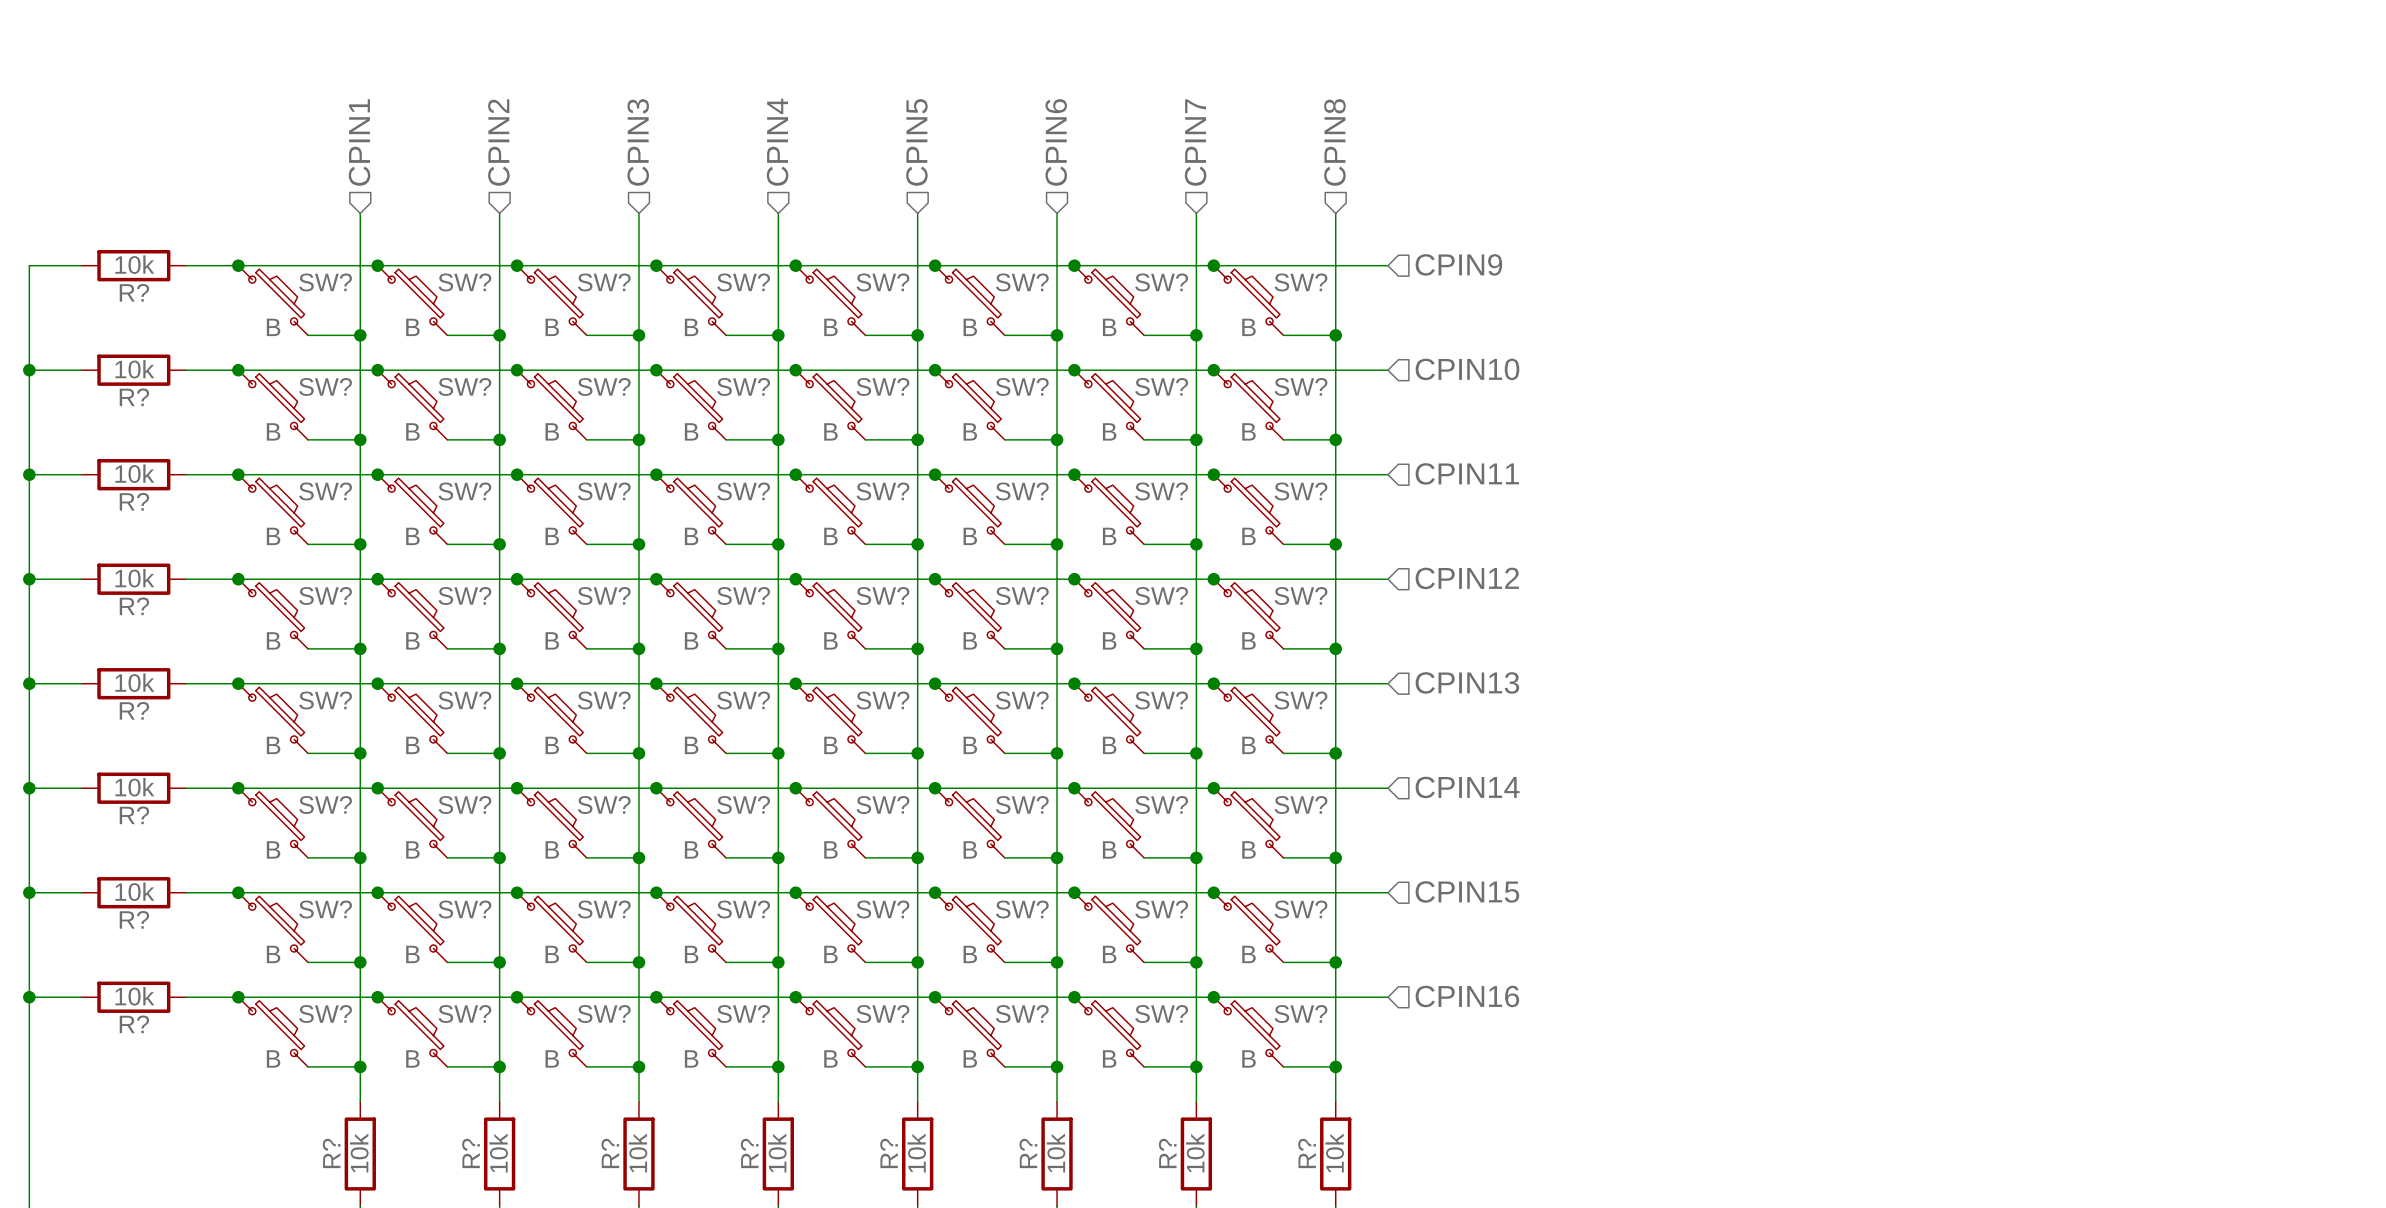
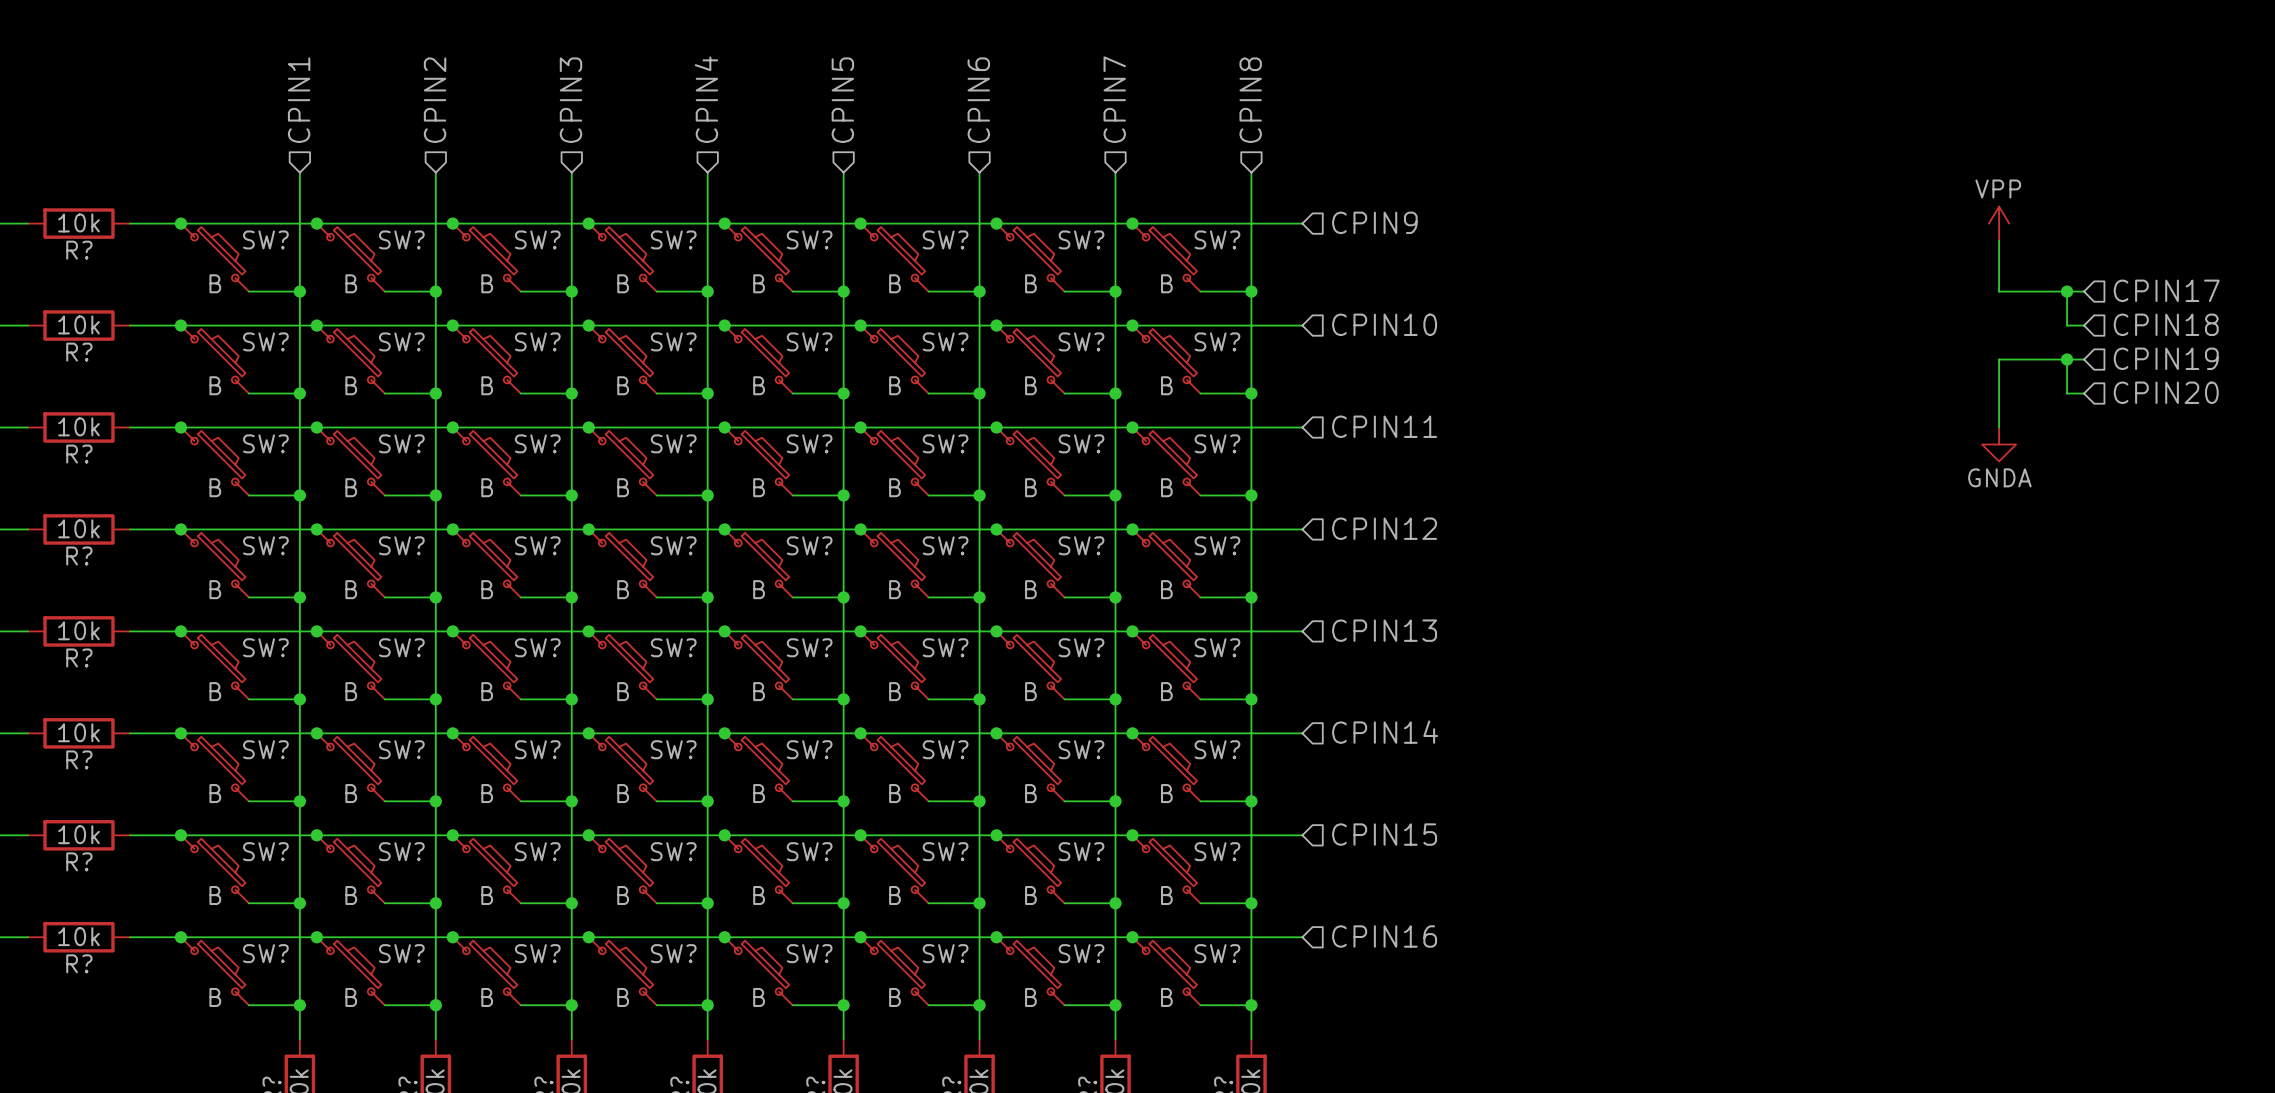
power symbol: none -> VPP (1999, 223)
wire: none -> (1999, 240) (1999, 291) (2084, 291)
hierarchical label: none -> CPIN17 (2166, 290)
wire: none -> (2067, 291) (2067, 325) (2084, 325)
junction: none -> (2067, 291)
hierarchical label: none -> CPIN18 (2166, 324)
hierarchical label: none -> CPIN19 (2166, 358)
wire: none -> (2067, 359) (2067, 393) (2084, 393)
junction: none -> (2067, 359)
wire: none -> (2084, 359) (1999, 359) (1999, 427)
hierarchical label: none -> CPIN20 (2166, 392)
power symbol: none -> GNDA (1999, 444)

